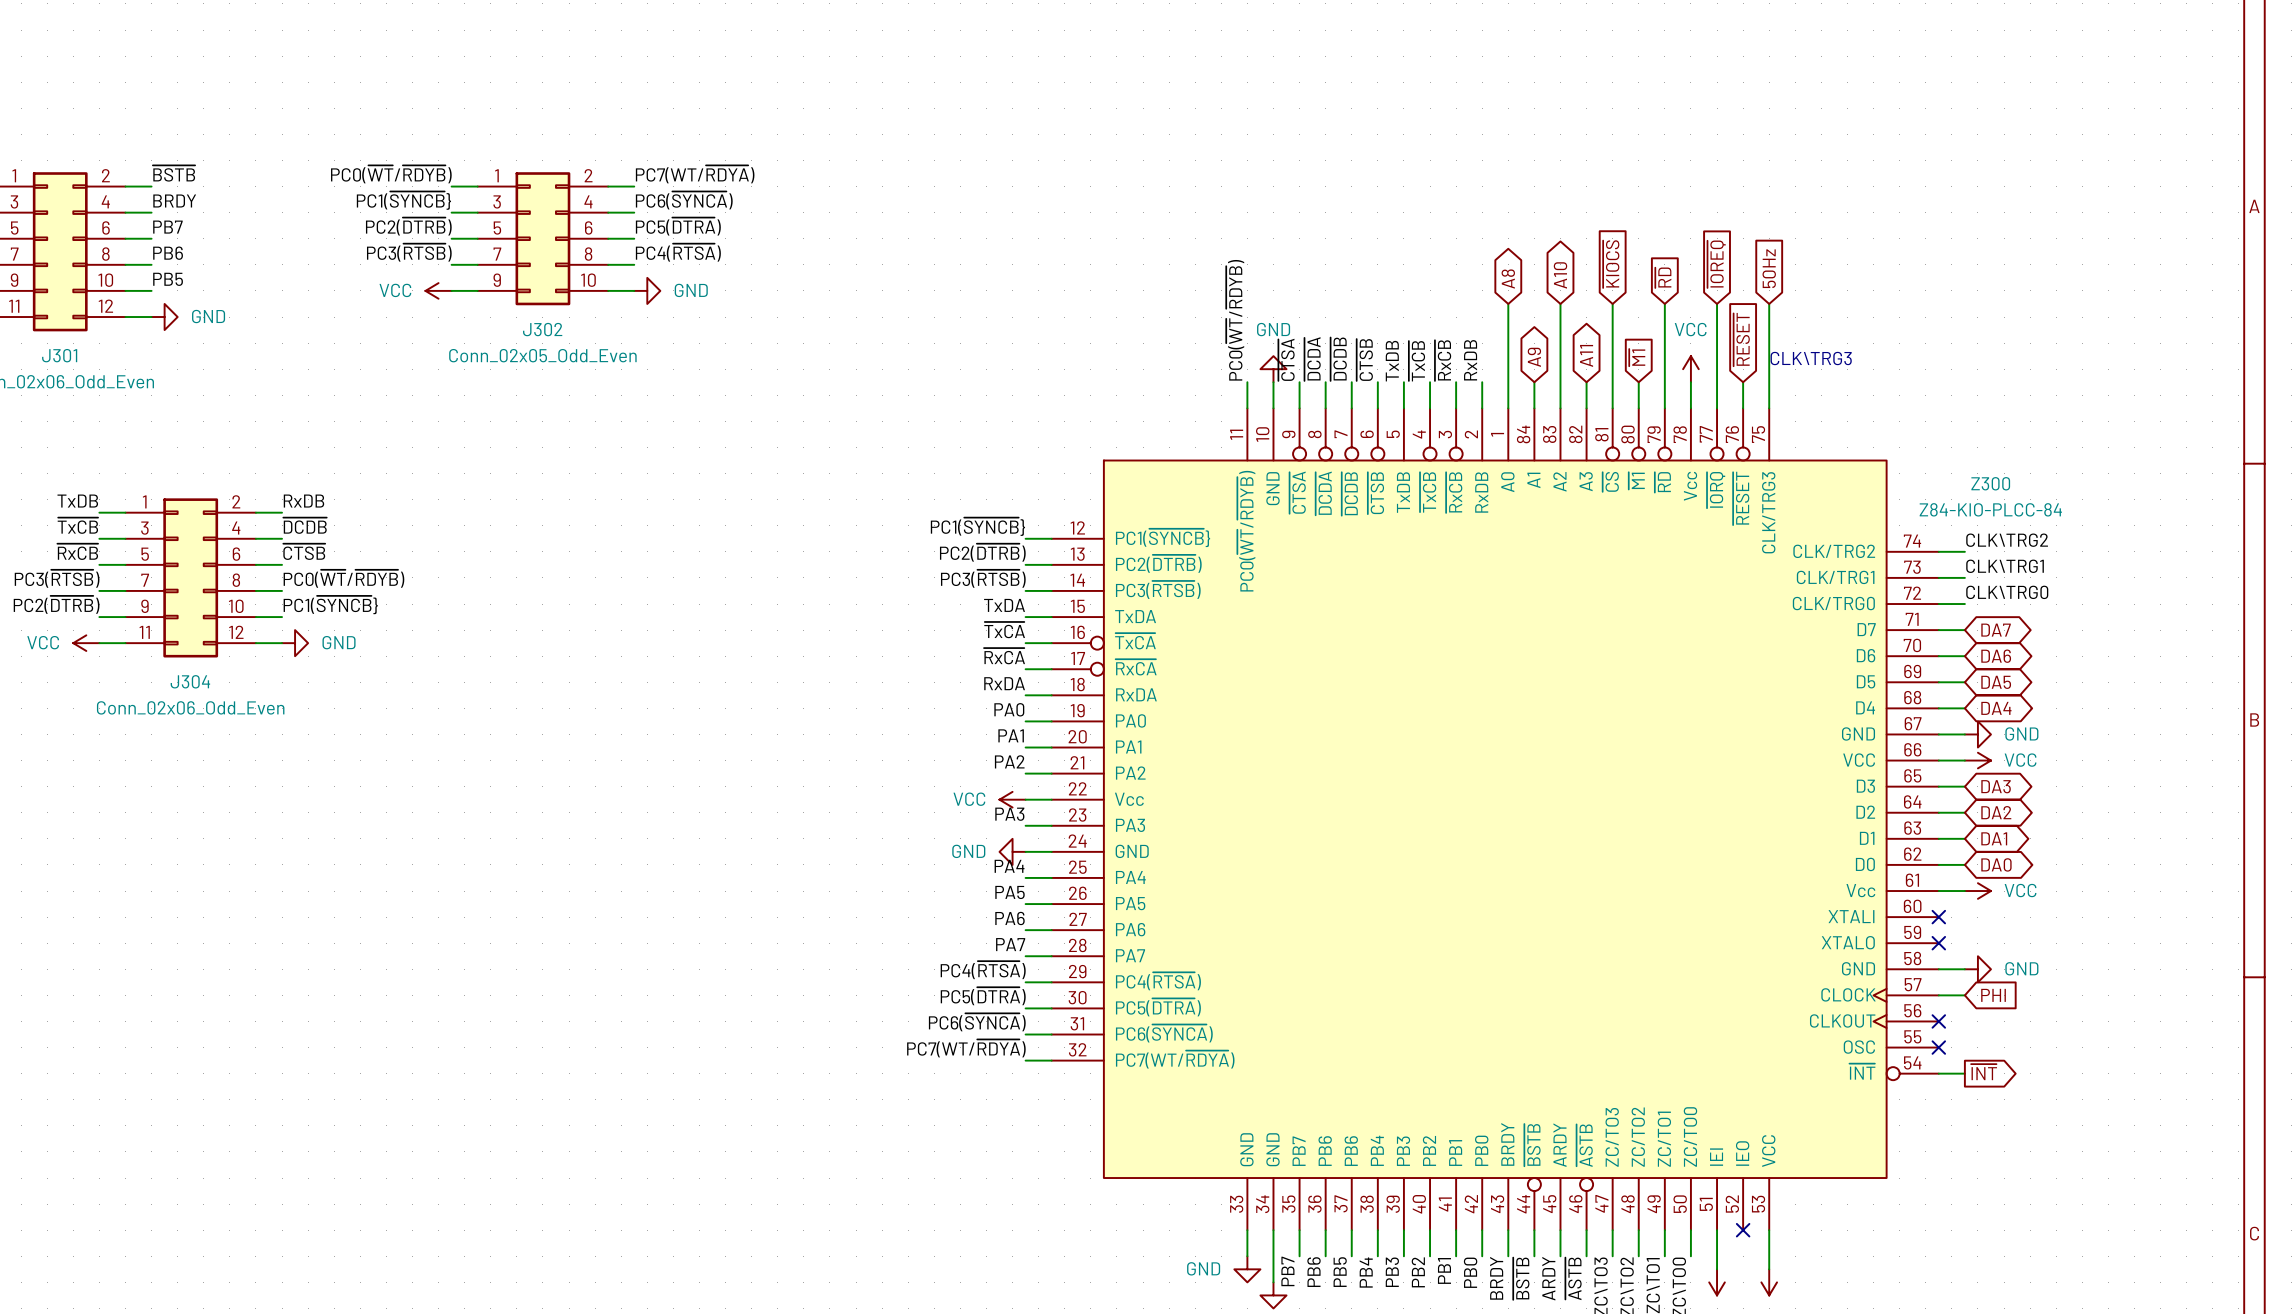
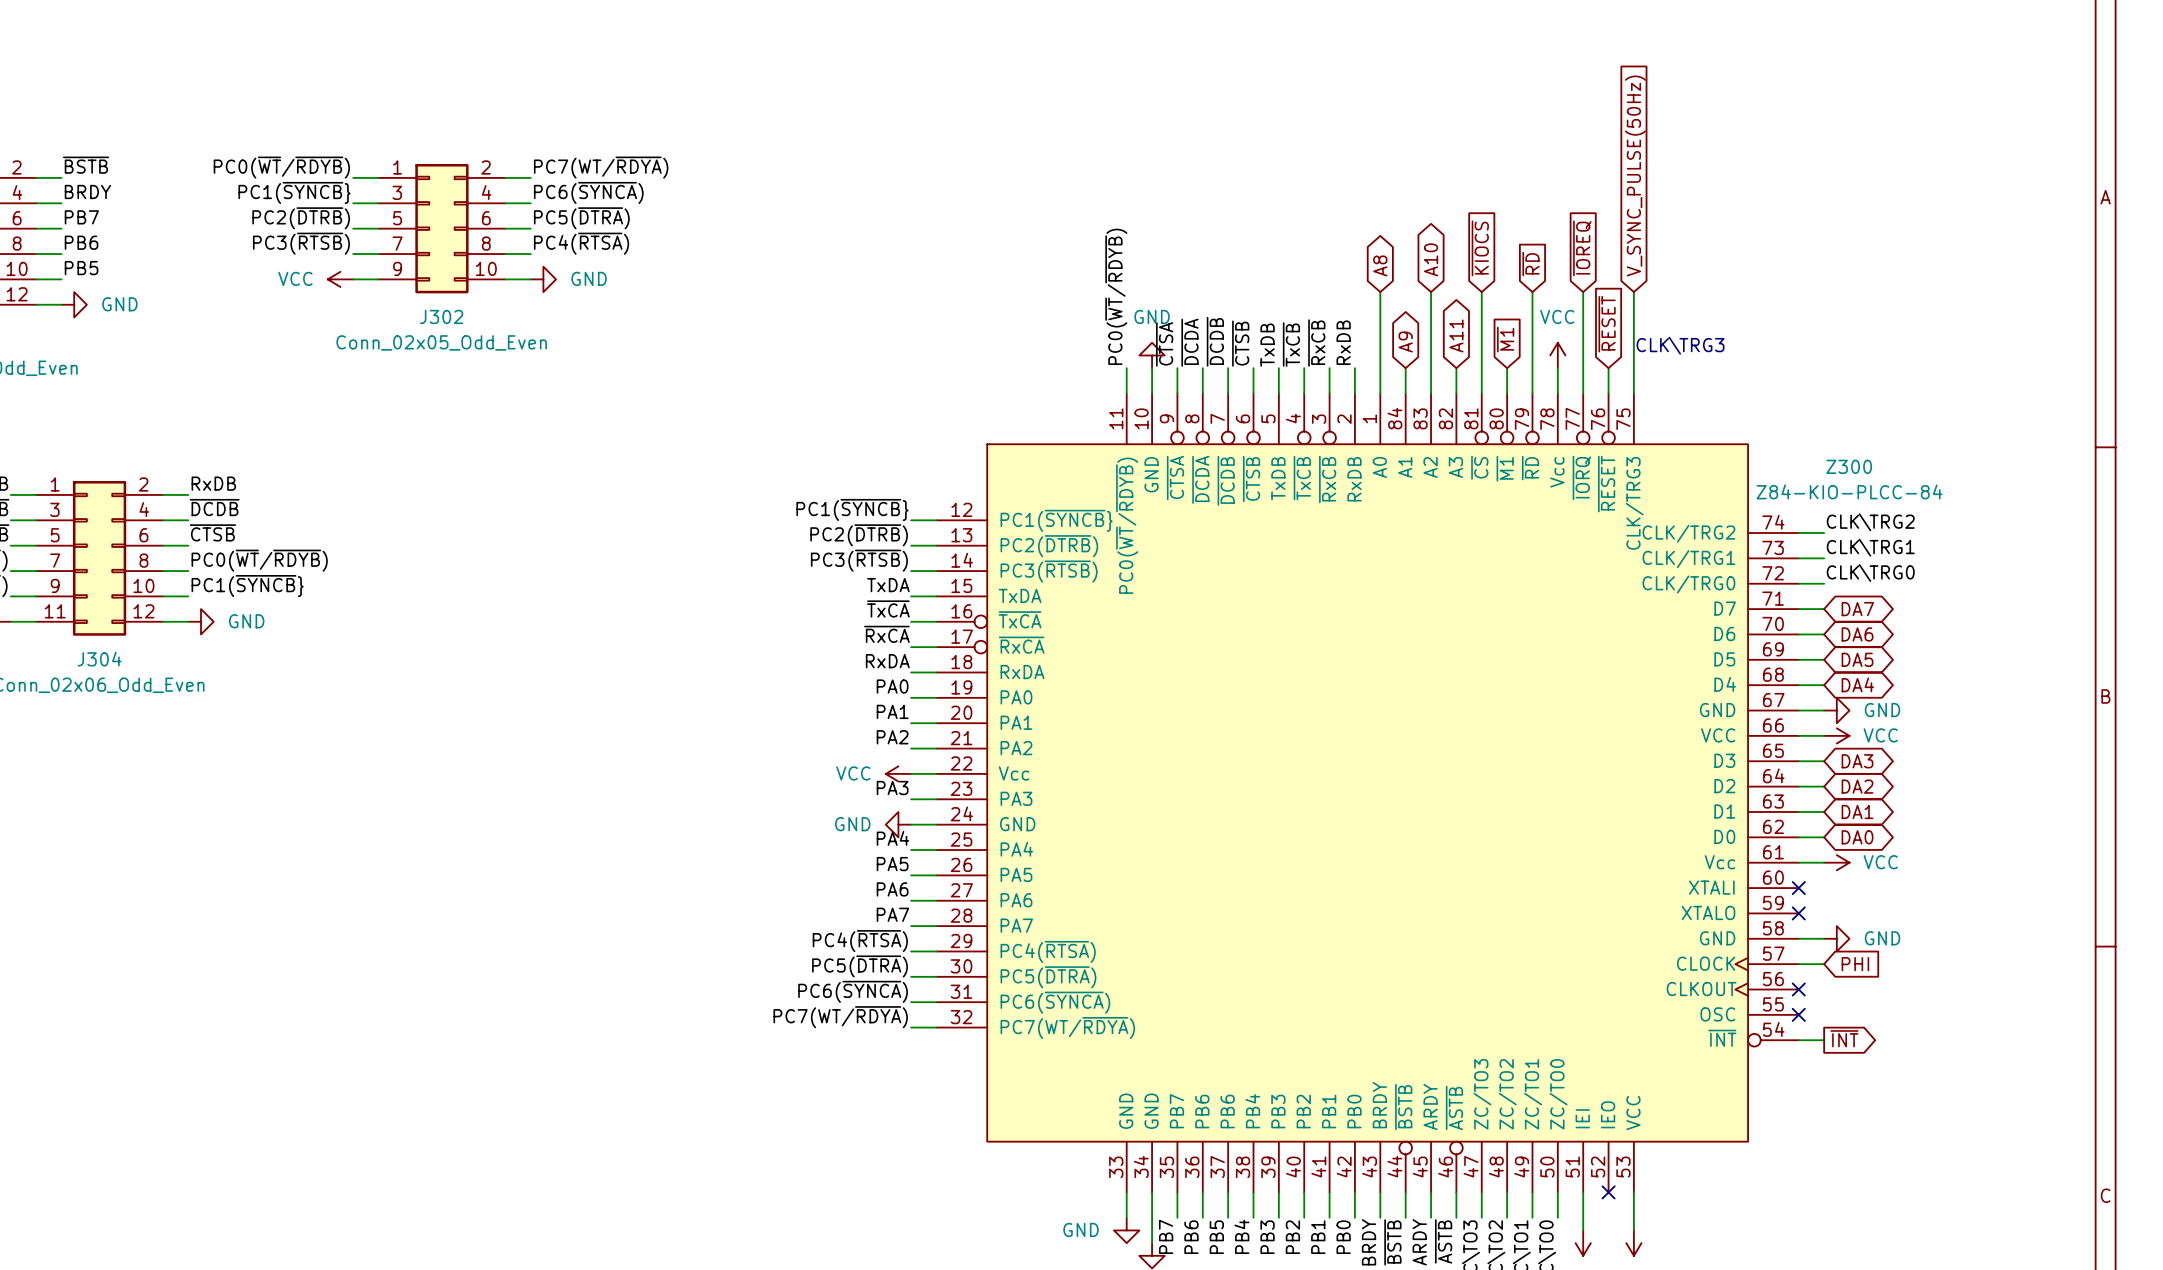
global label: 50Hz (1769, 268) -> V_SYNC_PULSE(50Hz) (1635, 175)

